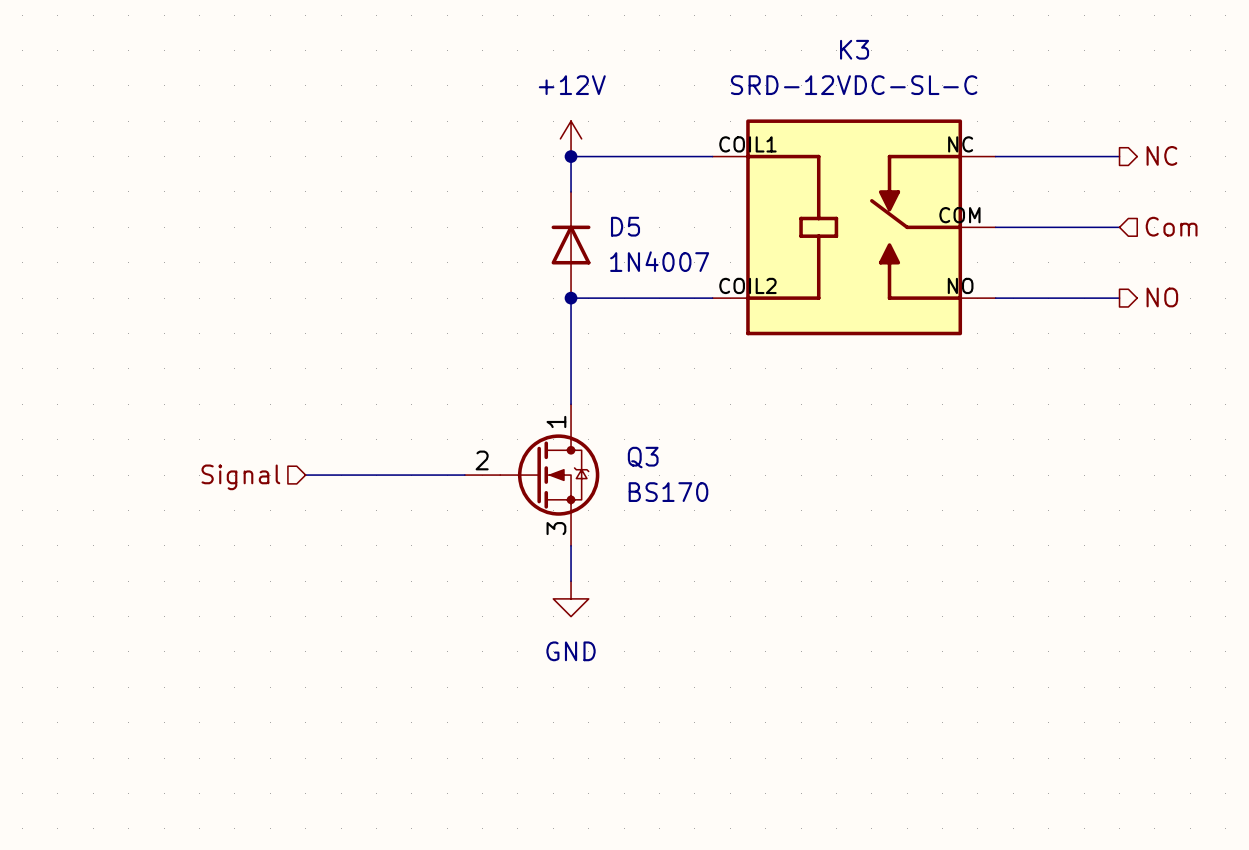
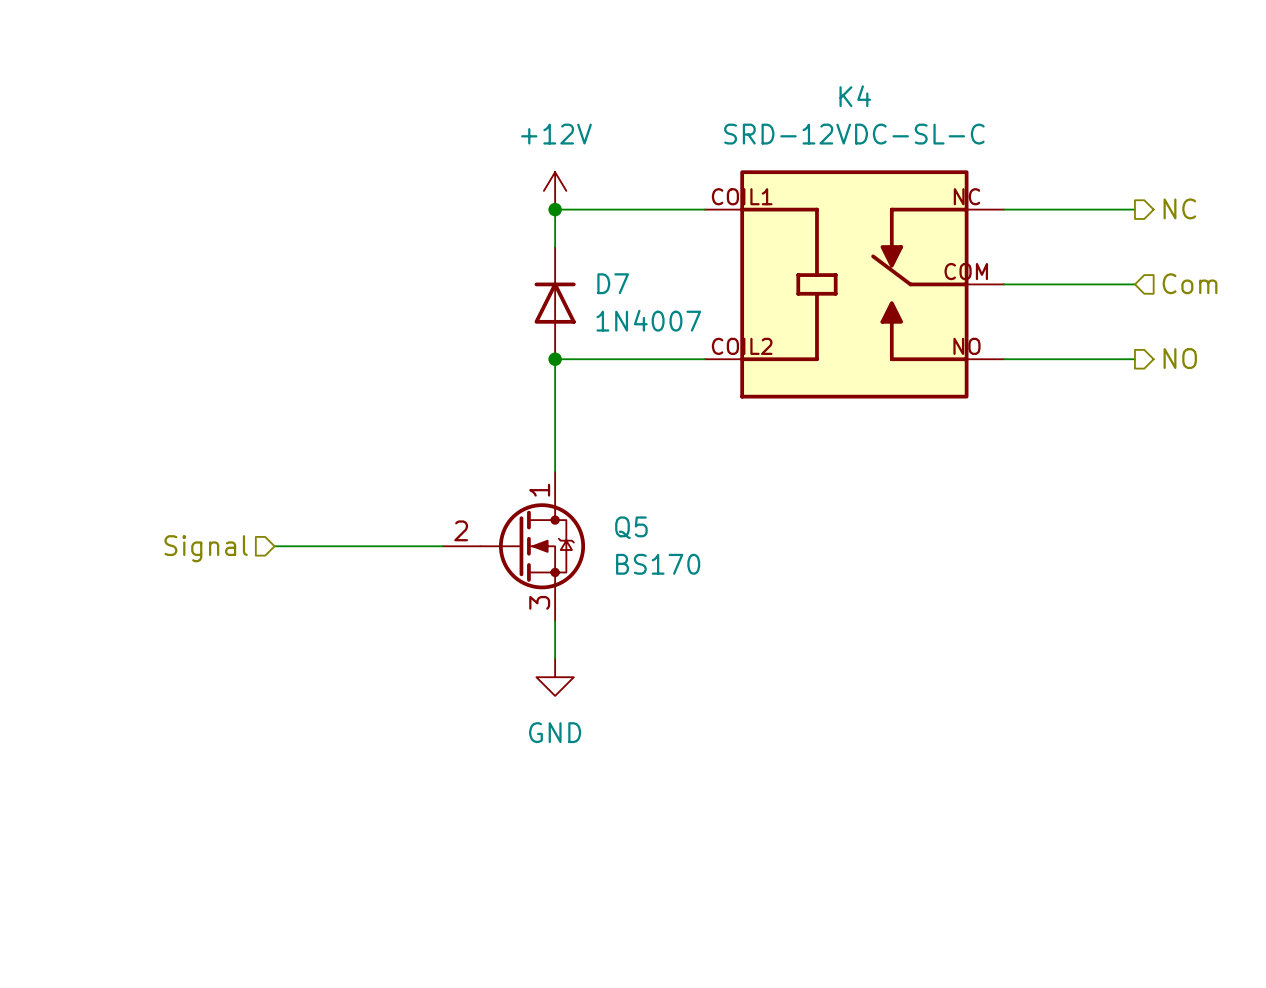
K3 name: K3 (854, 49) -> K4 (855, 96)
D5 name: D5 (625, 226) -> D7 (613, 283)
Q3 name: Q3 (643, 457) -> Q5 (631, 527)

